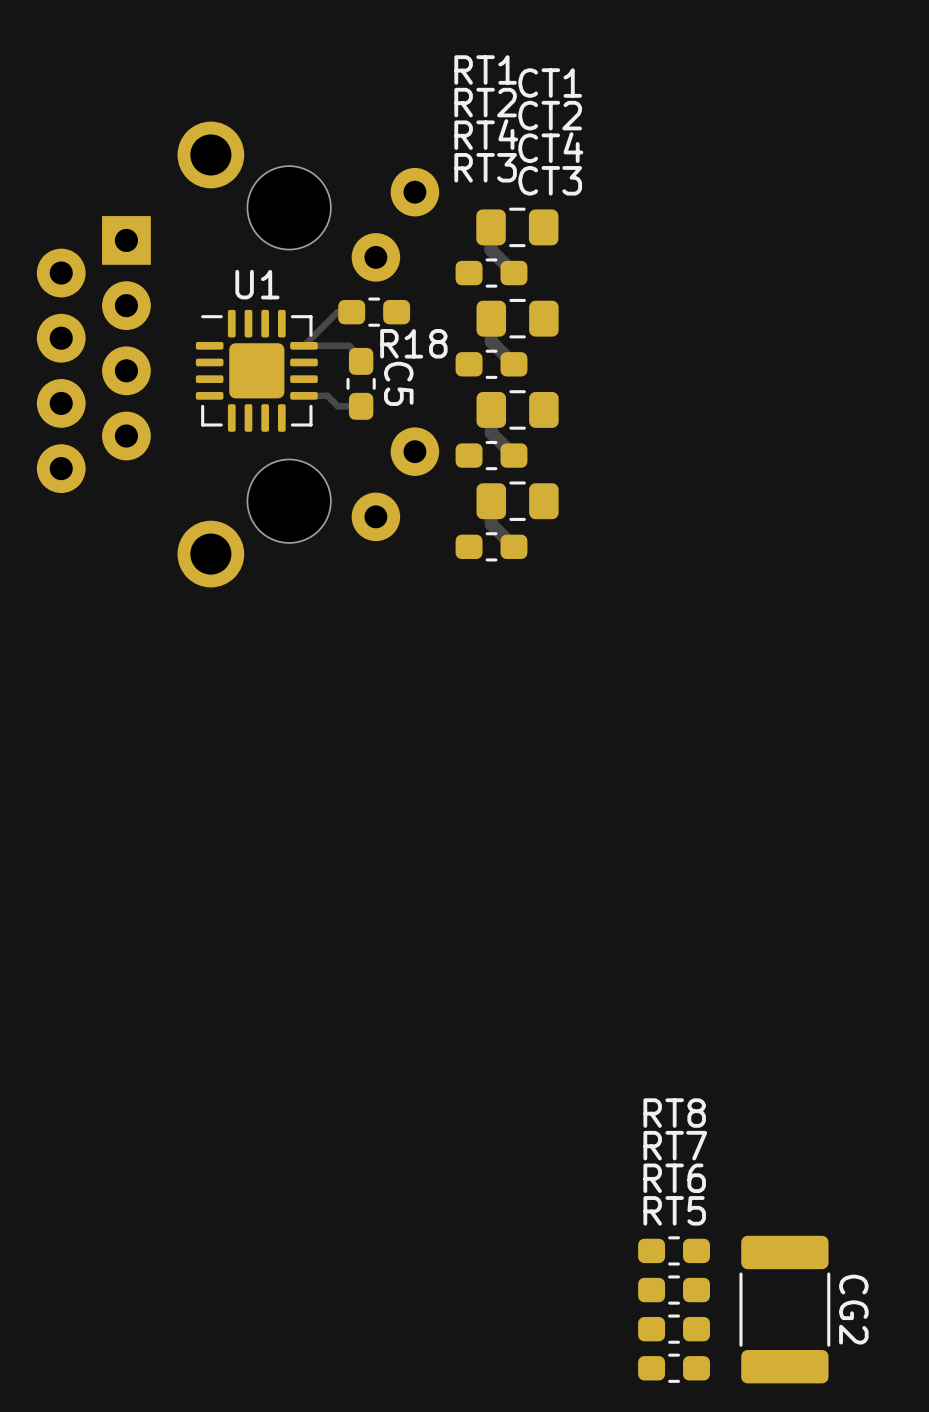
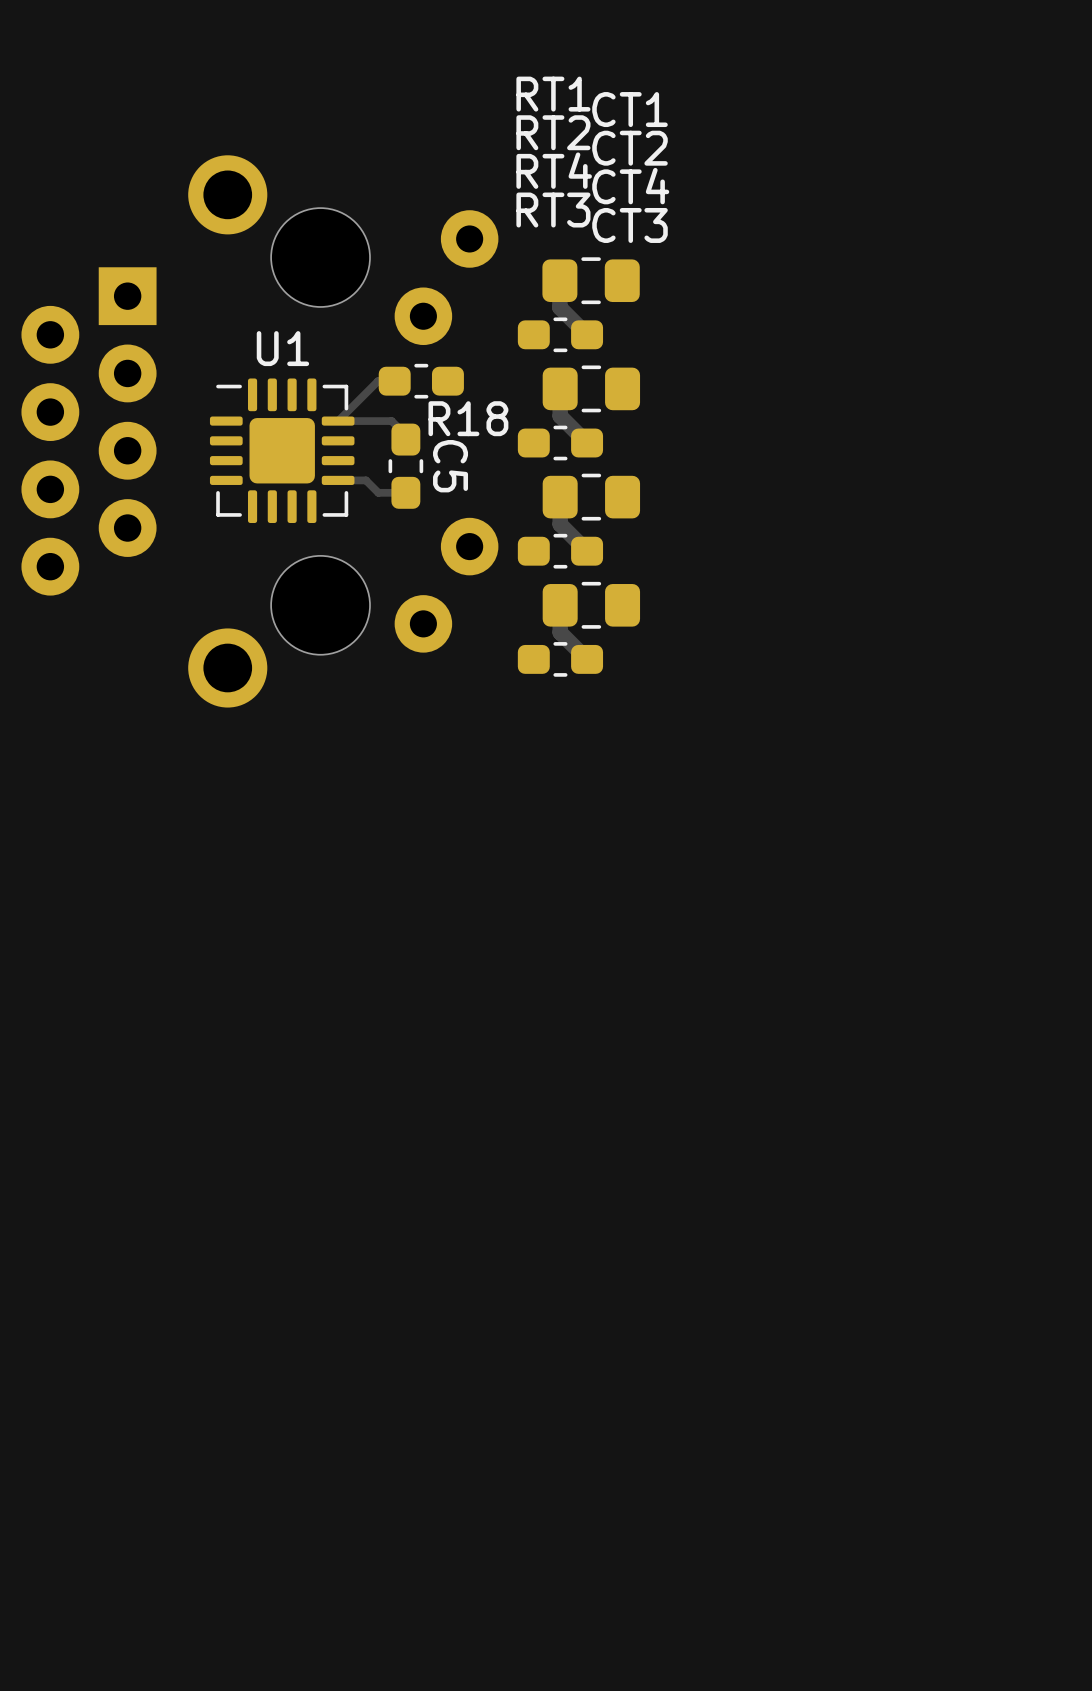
RT8: (674, 1250) -> none
RT7: (674, 1290) -> none
CG2: (784, 1309) -> none
RT6: (674, 1329) -> none
RT5: (674, 1368) -> none

